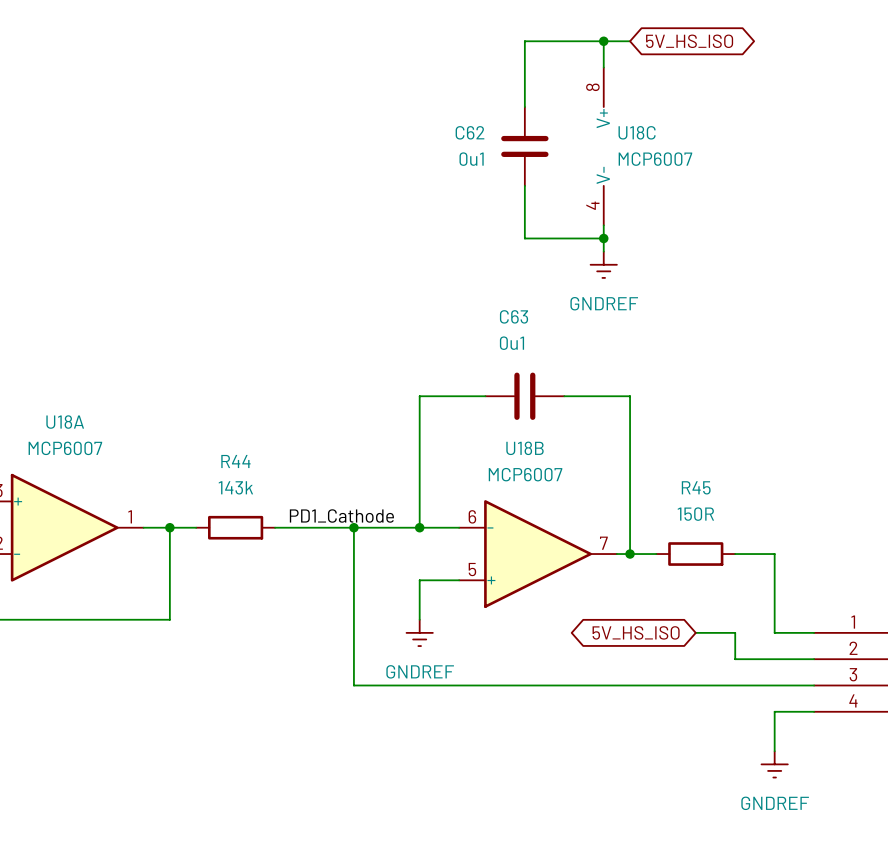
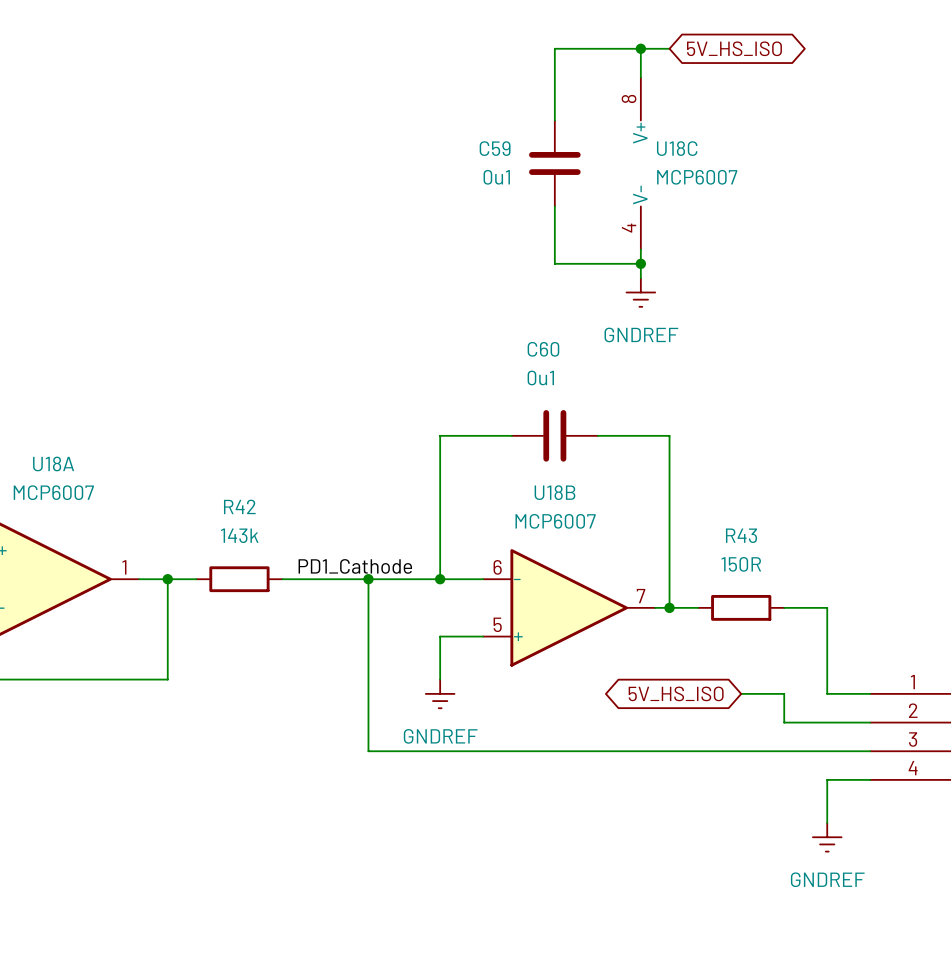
C62 name: C62 (469, 132) -> C59 (495, 148)
C63 name: C63 (514, 316) -> C60 (543, 349)
R44 name: R44 (235, 461) -> R42 (239, 506)
R45 name: R45 (696, 487) -> R43 (741, 535)

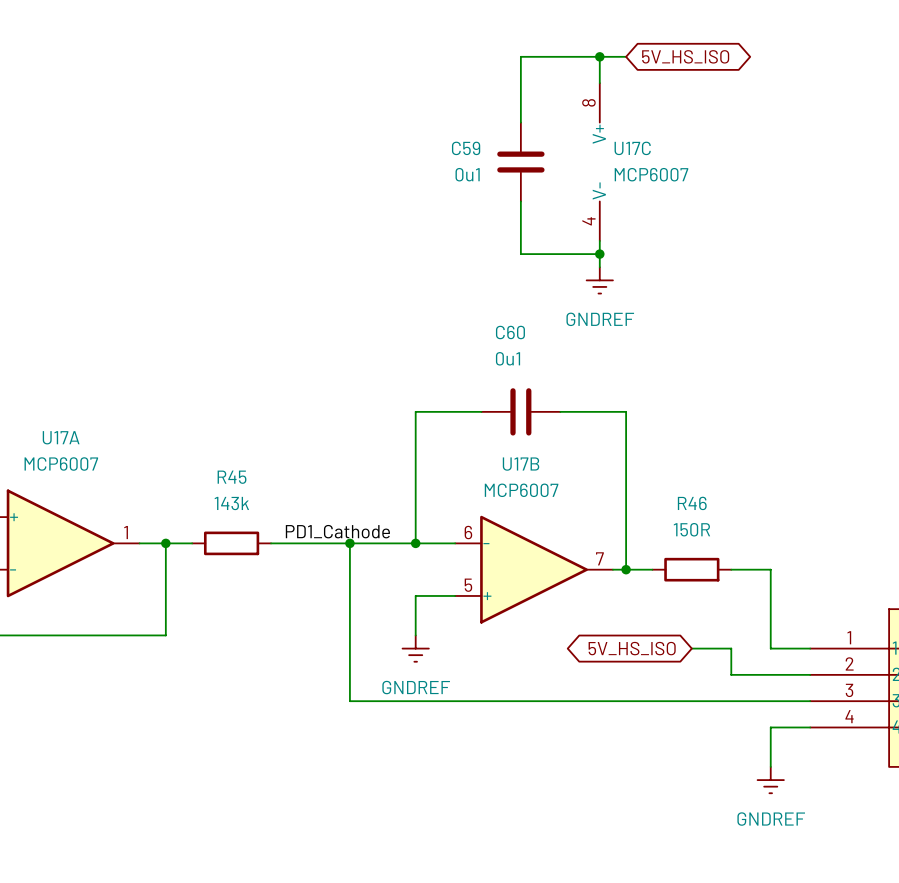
U18C name: U18C (677, 148) -> U17C (632, 148)
U18A name: U18A (53, 463) -> U17A (61, 437)
U18B name: U18B (554, 492) -> U17B (521, 464)
R42 name: R42 (239, 506) -> R45 (232, 477)
R43 name: R43 (741, 535) -> R46 (692, 503)

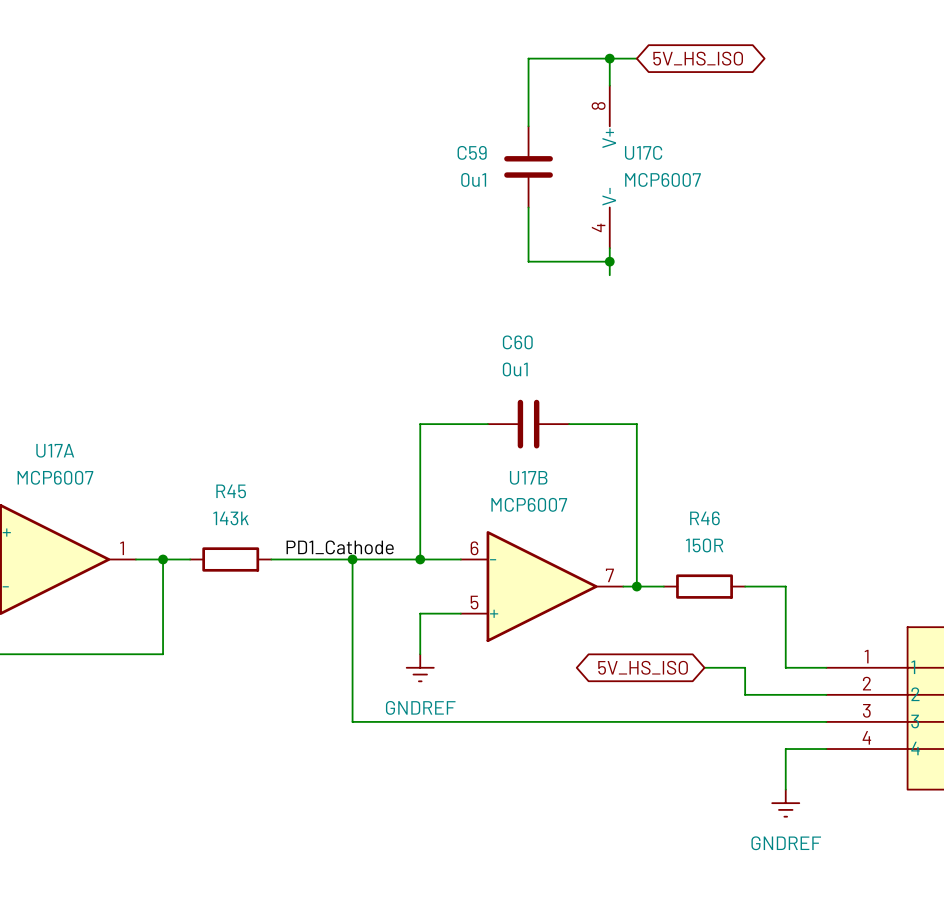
power symbol: GNDREF (599, 280) -> none

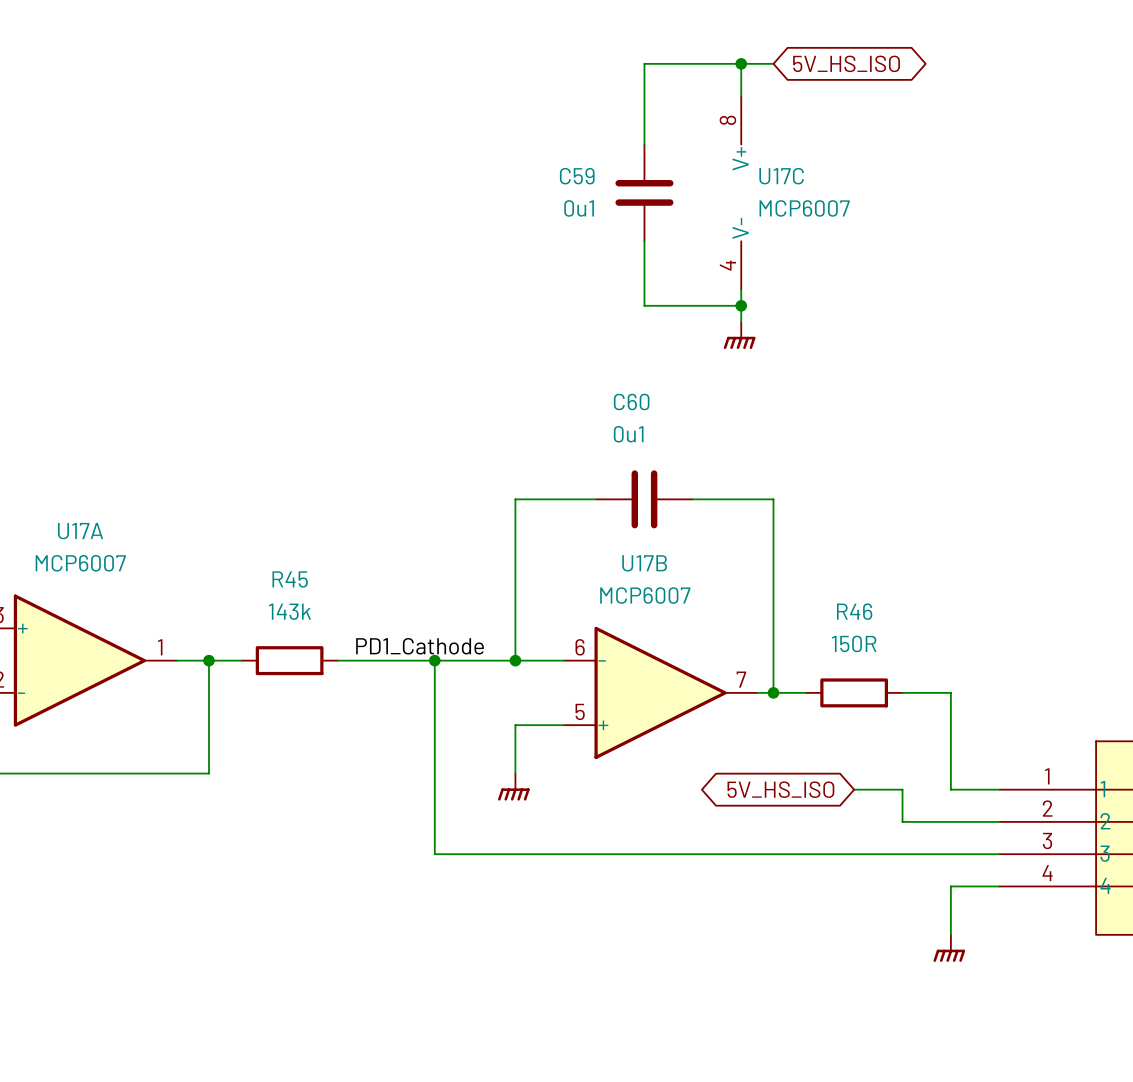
power symbol: none -> (739, 335)
power symbol shape: [406, 654, 434, 682] -> [498, 773, 530, 801]
power symbol text: GNDREF (420, 707) -> none
power symbol shape: [772, 789, 800, 817] -> [933, 934, 966, 962]
power symbol text: GNDREF (786, 843) -> none

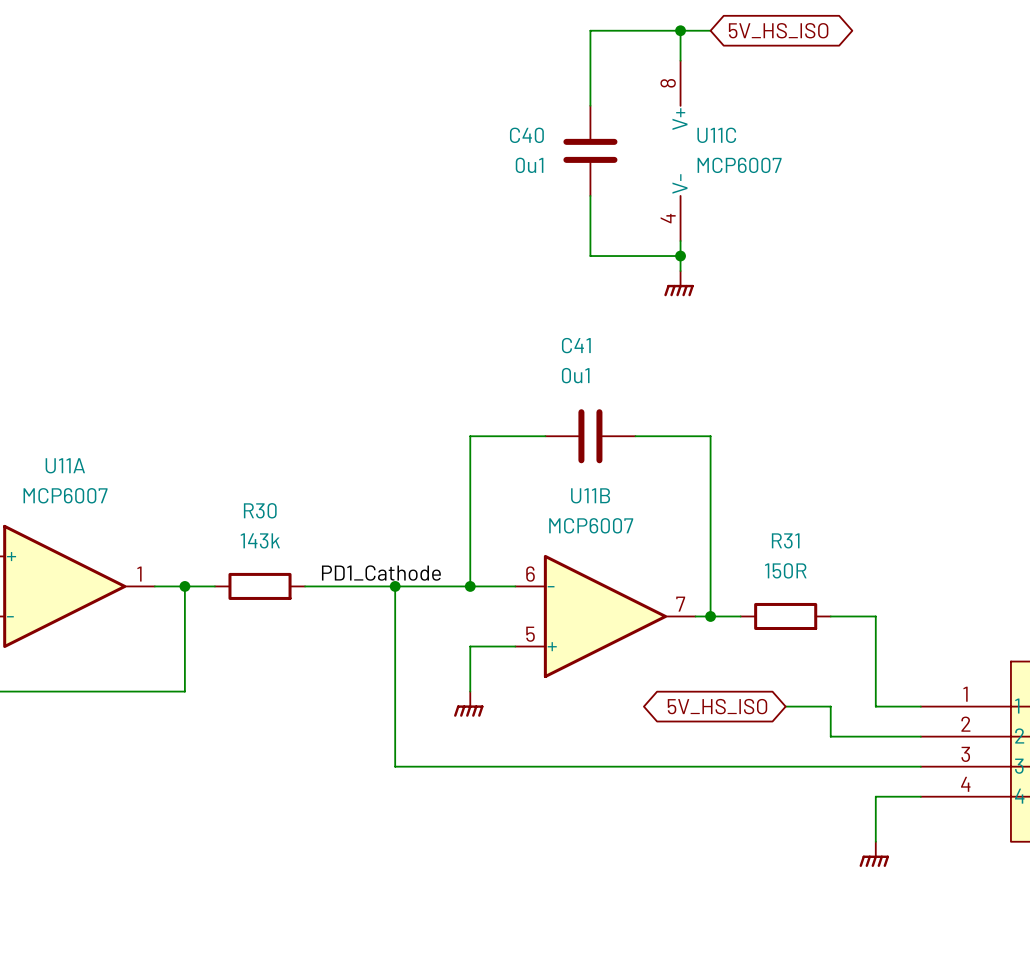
C59 name: C59 (577, 176) -> C40 (526, 135)
U17C name: U17C (781, 176) -> U11C (716, 135)
C60 name: C60 (631, 401) -> C41 (576, 345)
U17A name: U17A (80, 531) -> U11A (65, 465)
U17B name: U17B (644, 563) -> U11B (590, 495)
R45 name: R45 (290, 579) -> R30 (260, 510)
R46 name: R46 (854, 611) -> R31 (785, 540)

